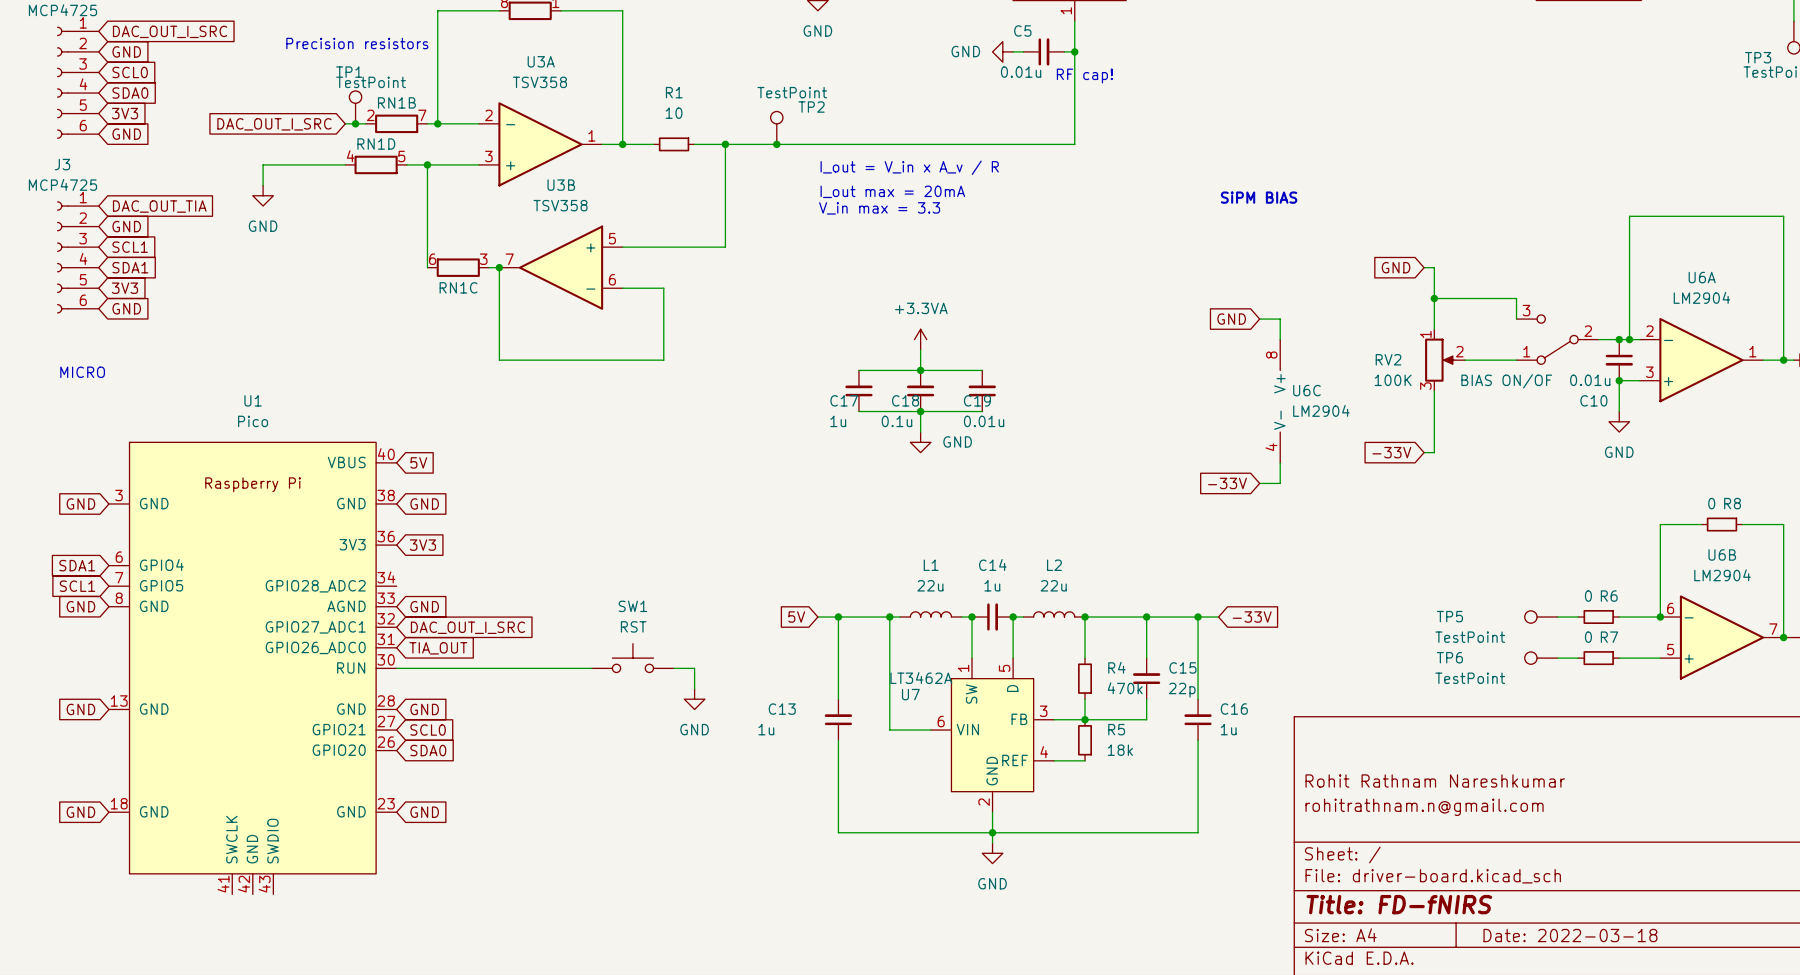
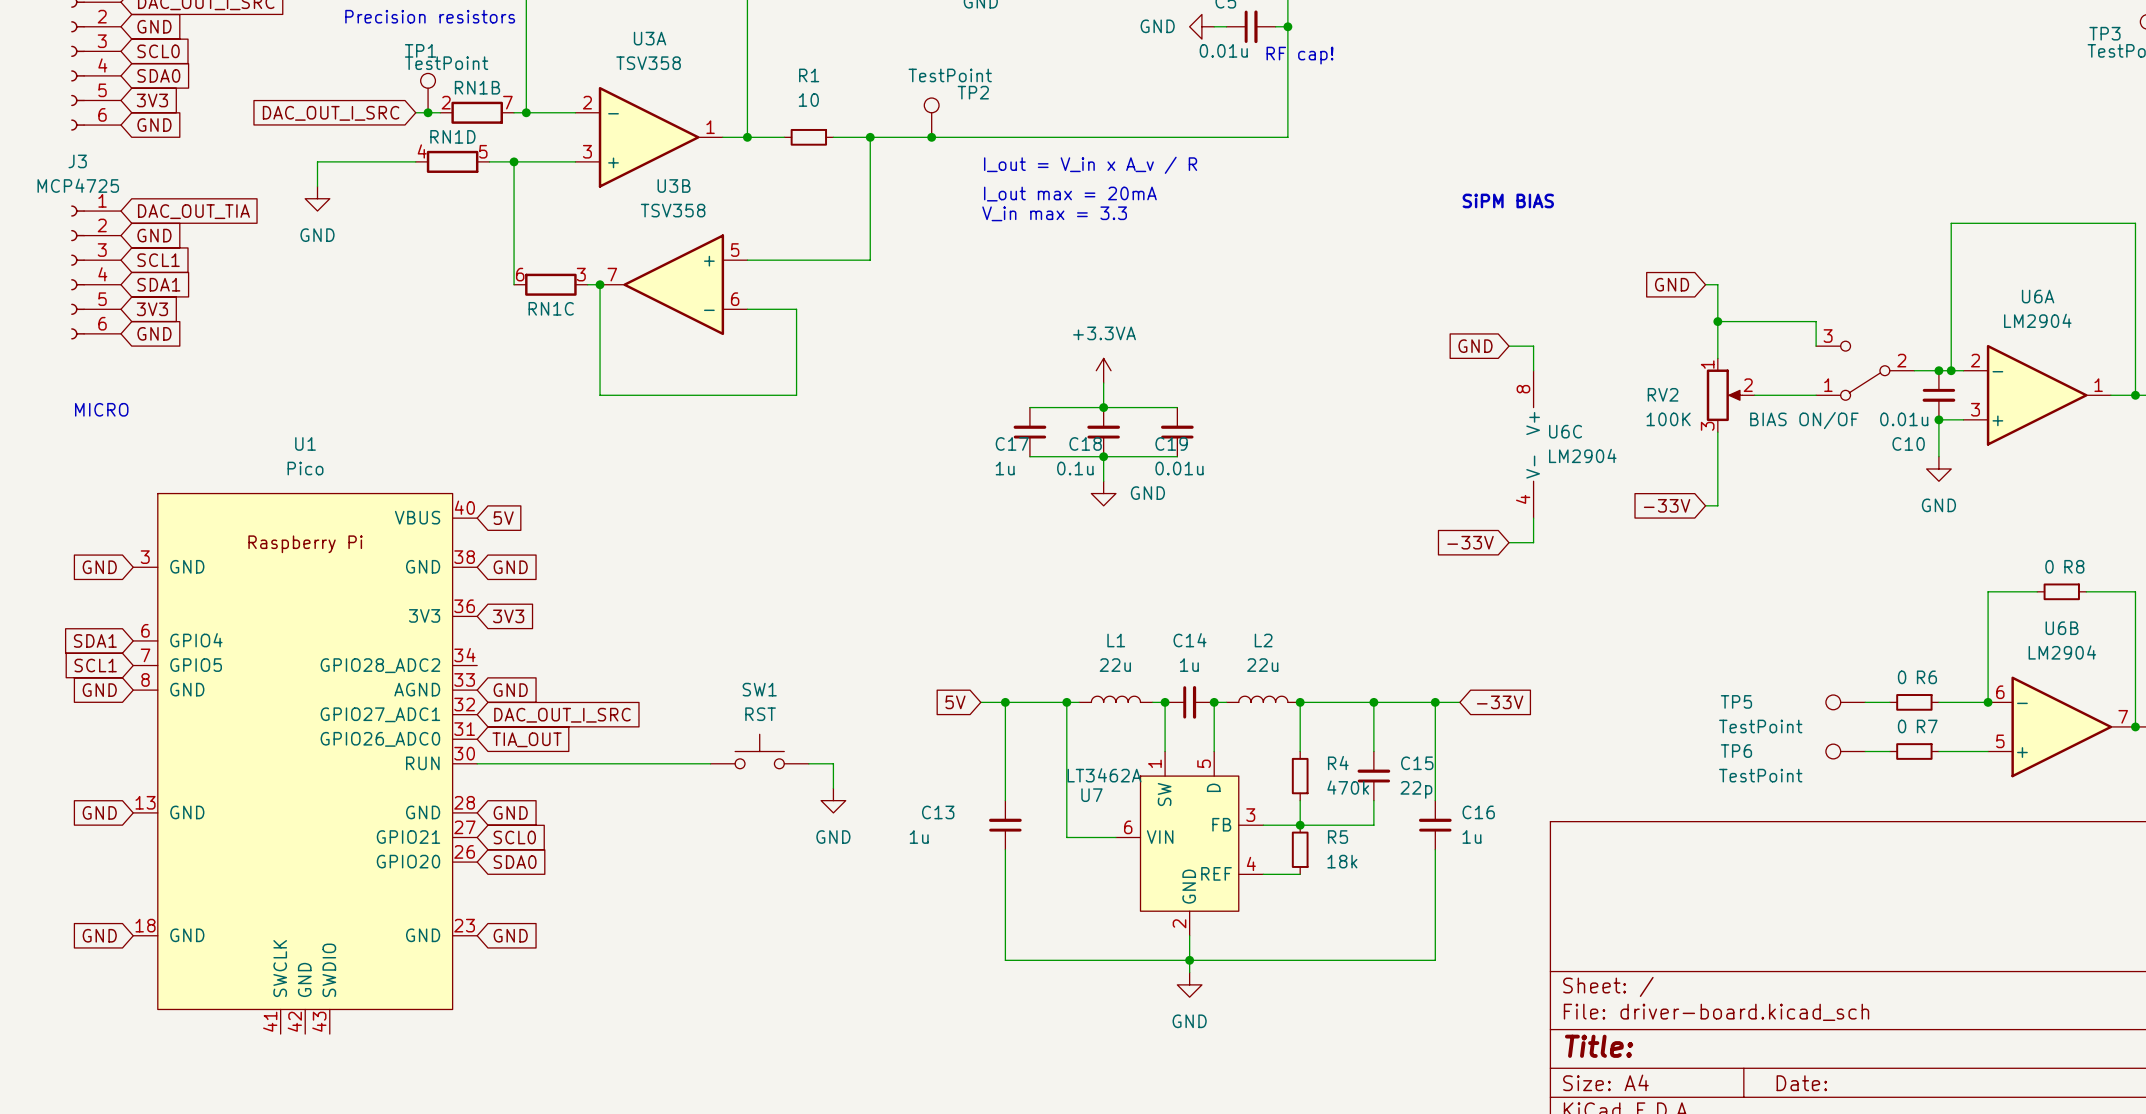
title block: Rohit Rathnam Nareshkumar (1435, 781) -> none
title block: rohitrathnam.n@gmail.com (1424, 807) -> none
title block: Title: FD-fNIRS (1399, 904) -> Title: (1599, 1046)
title block: Date: 2022-03-18 (1570, 935) -> Date: (1801, 1083)

